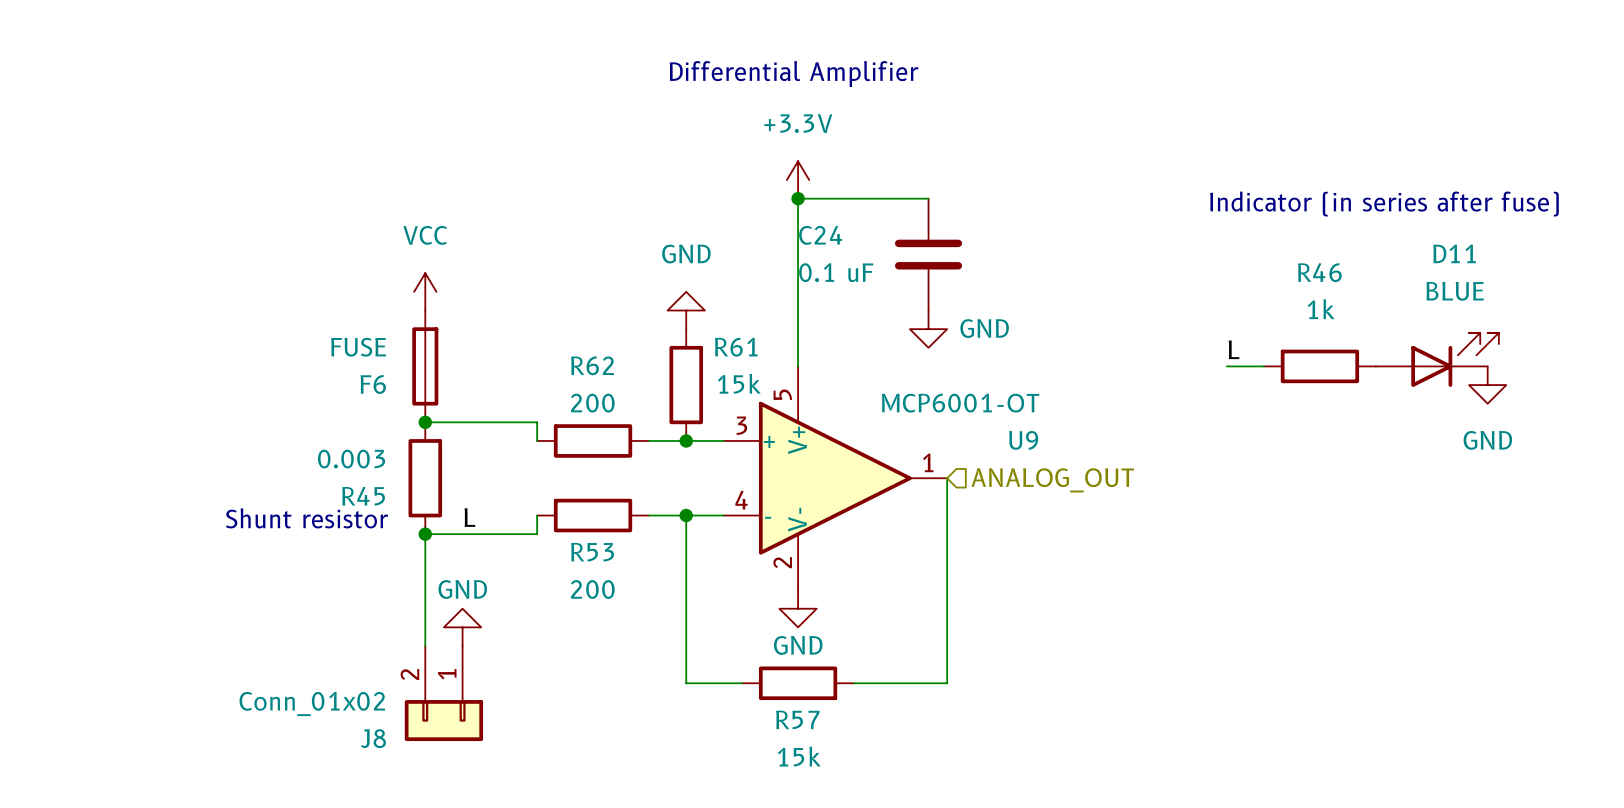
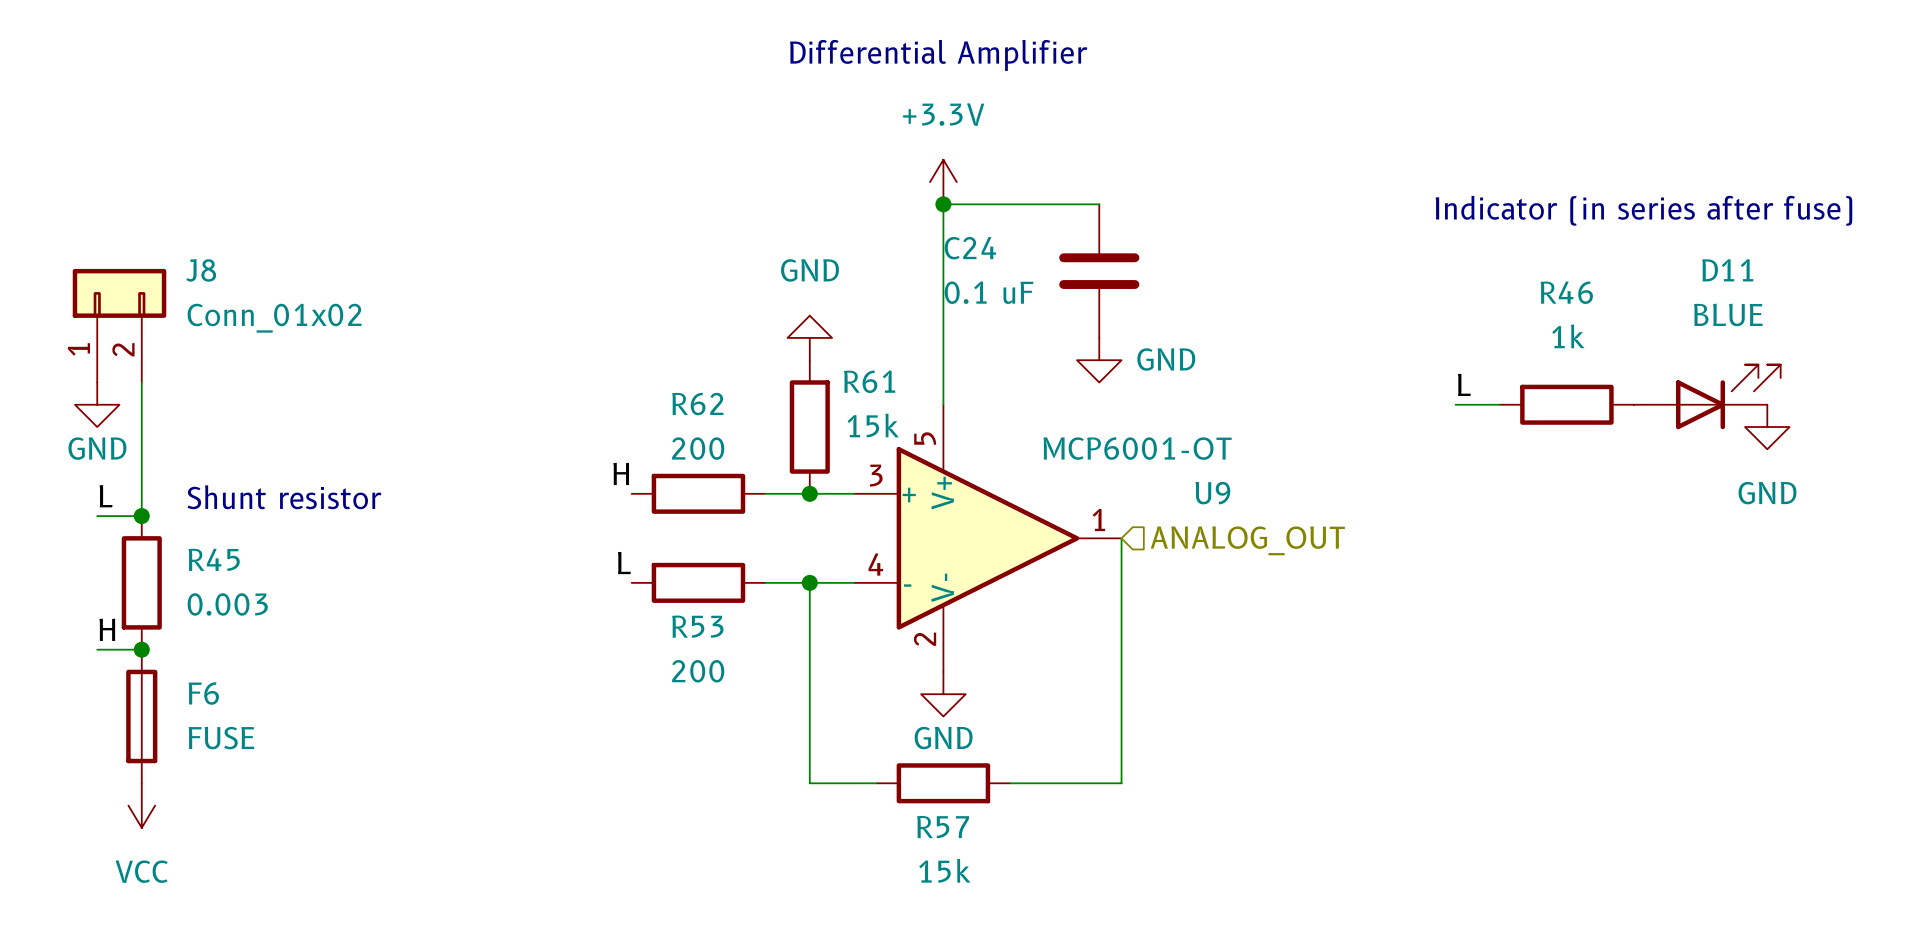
power symbol: VCC (425, 291) -> none
wire: none -> (141, 382) (141, 516) (97, 516)
F6 value position: FUSE (358, 347) -> FUSE (221, 738)
power symbol: none -> GND (97, 404)
F6 position: (425, 366) -> (141, 716)
F6 name position: F6 (373, 384) -> F6 (203, 693)
wire: (425, 422) (537, 422) (537, 440) -> none
junction: (425, 422) -> none
label: none -> H (621, 473)
label: none -> L (106, 496)
junction: none -> (141, 516)
R45 value position: 0.003 (351, 459) -> 0.003 (227, 604)
R45 position: (425, 478) -> (141, 582)
R45 name position: R45 (363, 496) -> R45 (214, 559)
wire: (537, 515) (537, 534) (425, 534) (425, 646) -> none
label position: L (469, 517) -> L (624, 563)
text position: Shunt resistor (306, 518) -> Shunt resistor (284, 497)
junction: (425, 534) -> none
label: none -> H (107, 629)
wire: none -> (97, 649) (141, 649)
junction: none -> (141, 649)
power symbol: GND (462, 627) -> none
J8 position: (443, 693) -> (119, 325)
power symbol: none -> VCC (141, 805)
J8 rotation: 0° (443, 720) -> 180° (119, 293)

